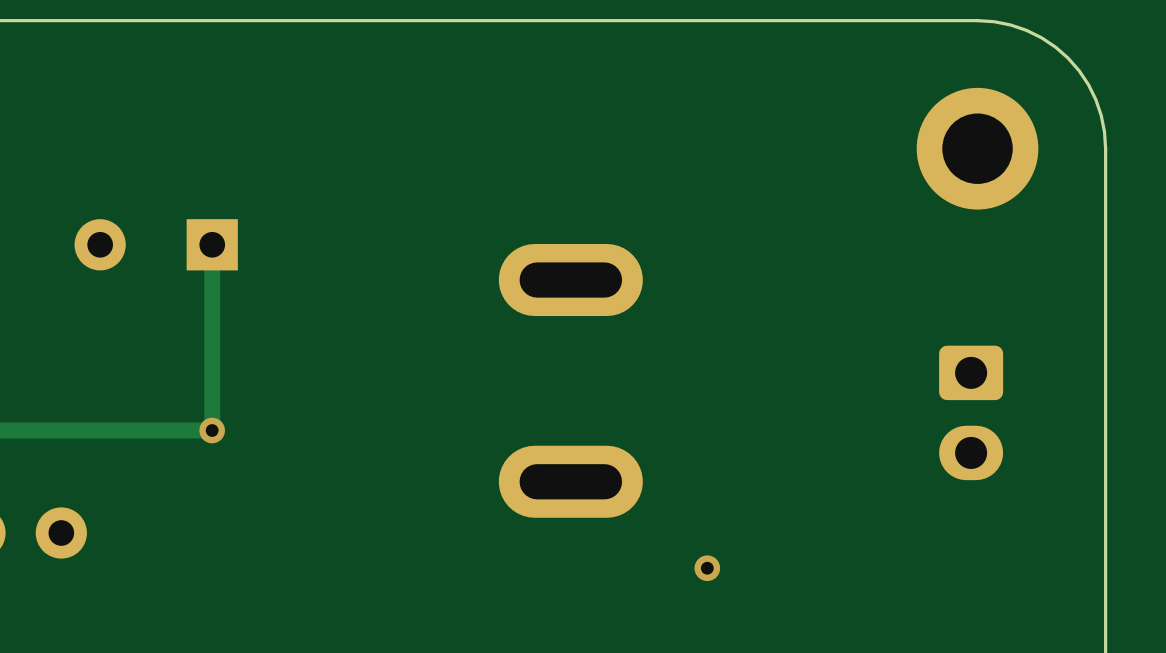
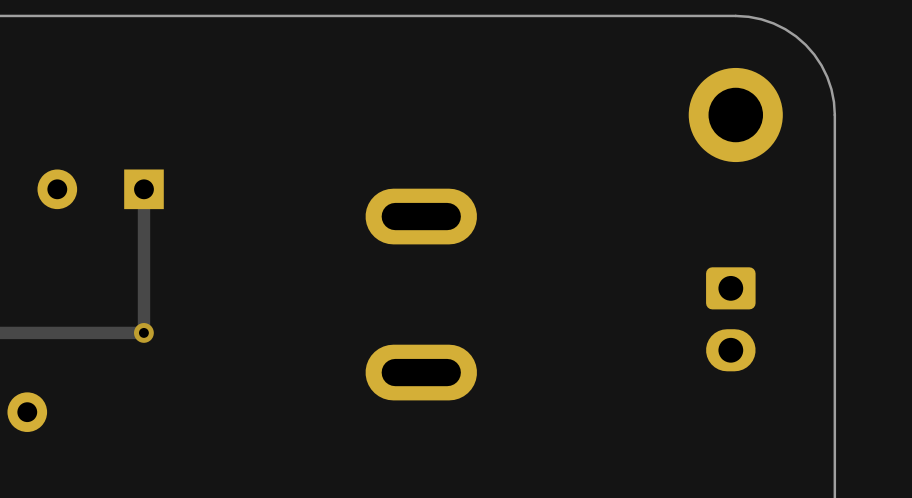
via: (707, 568) -> none

